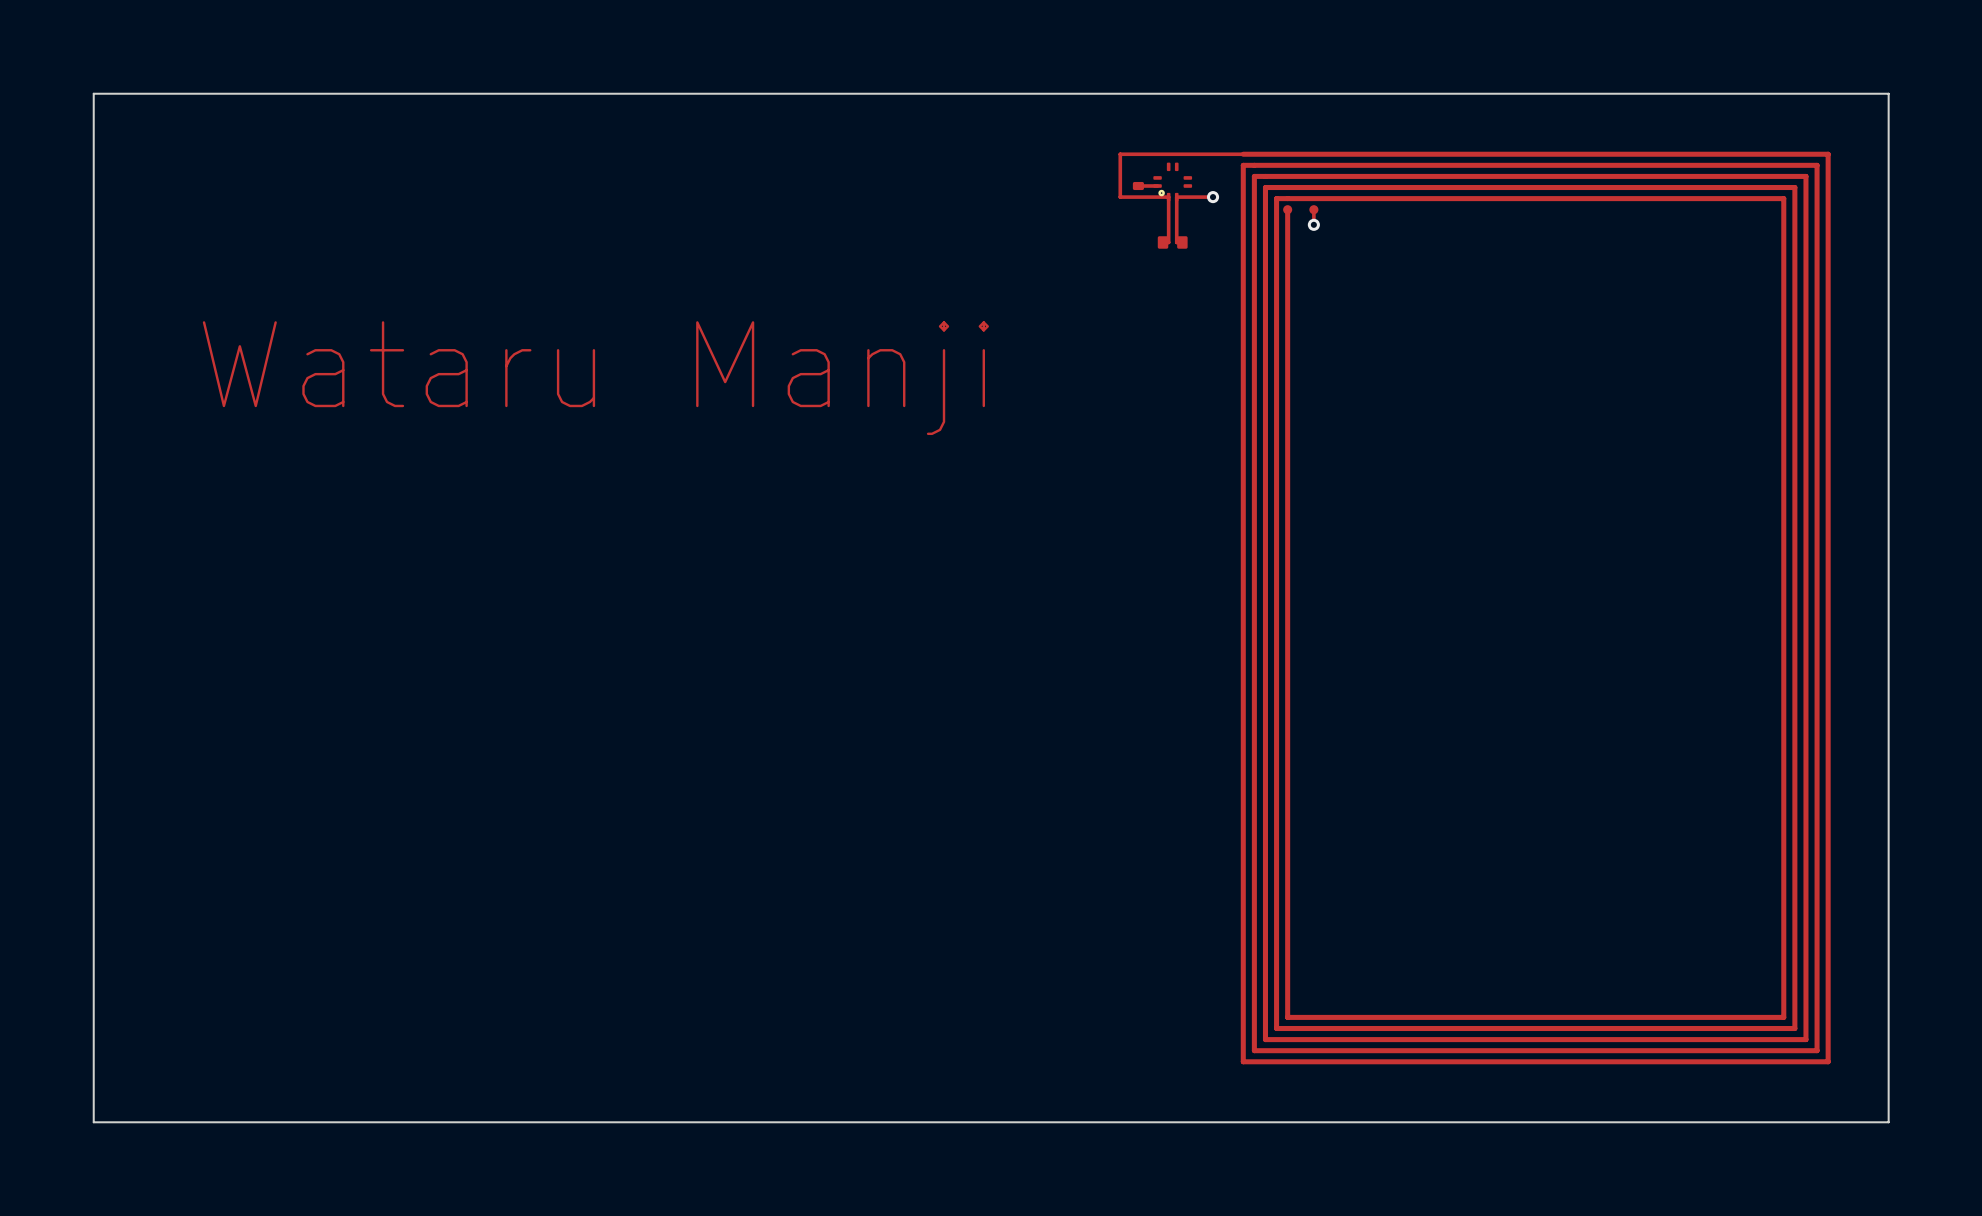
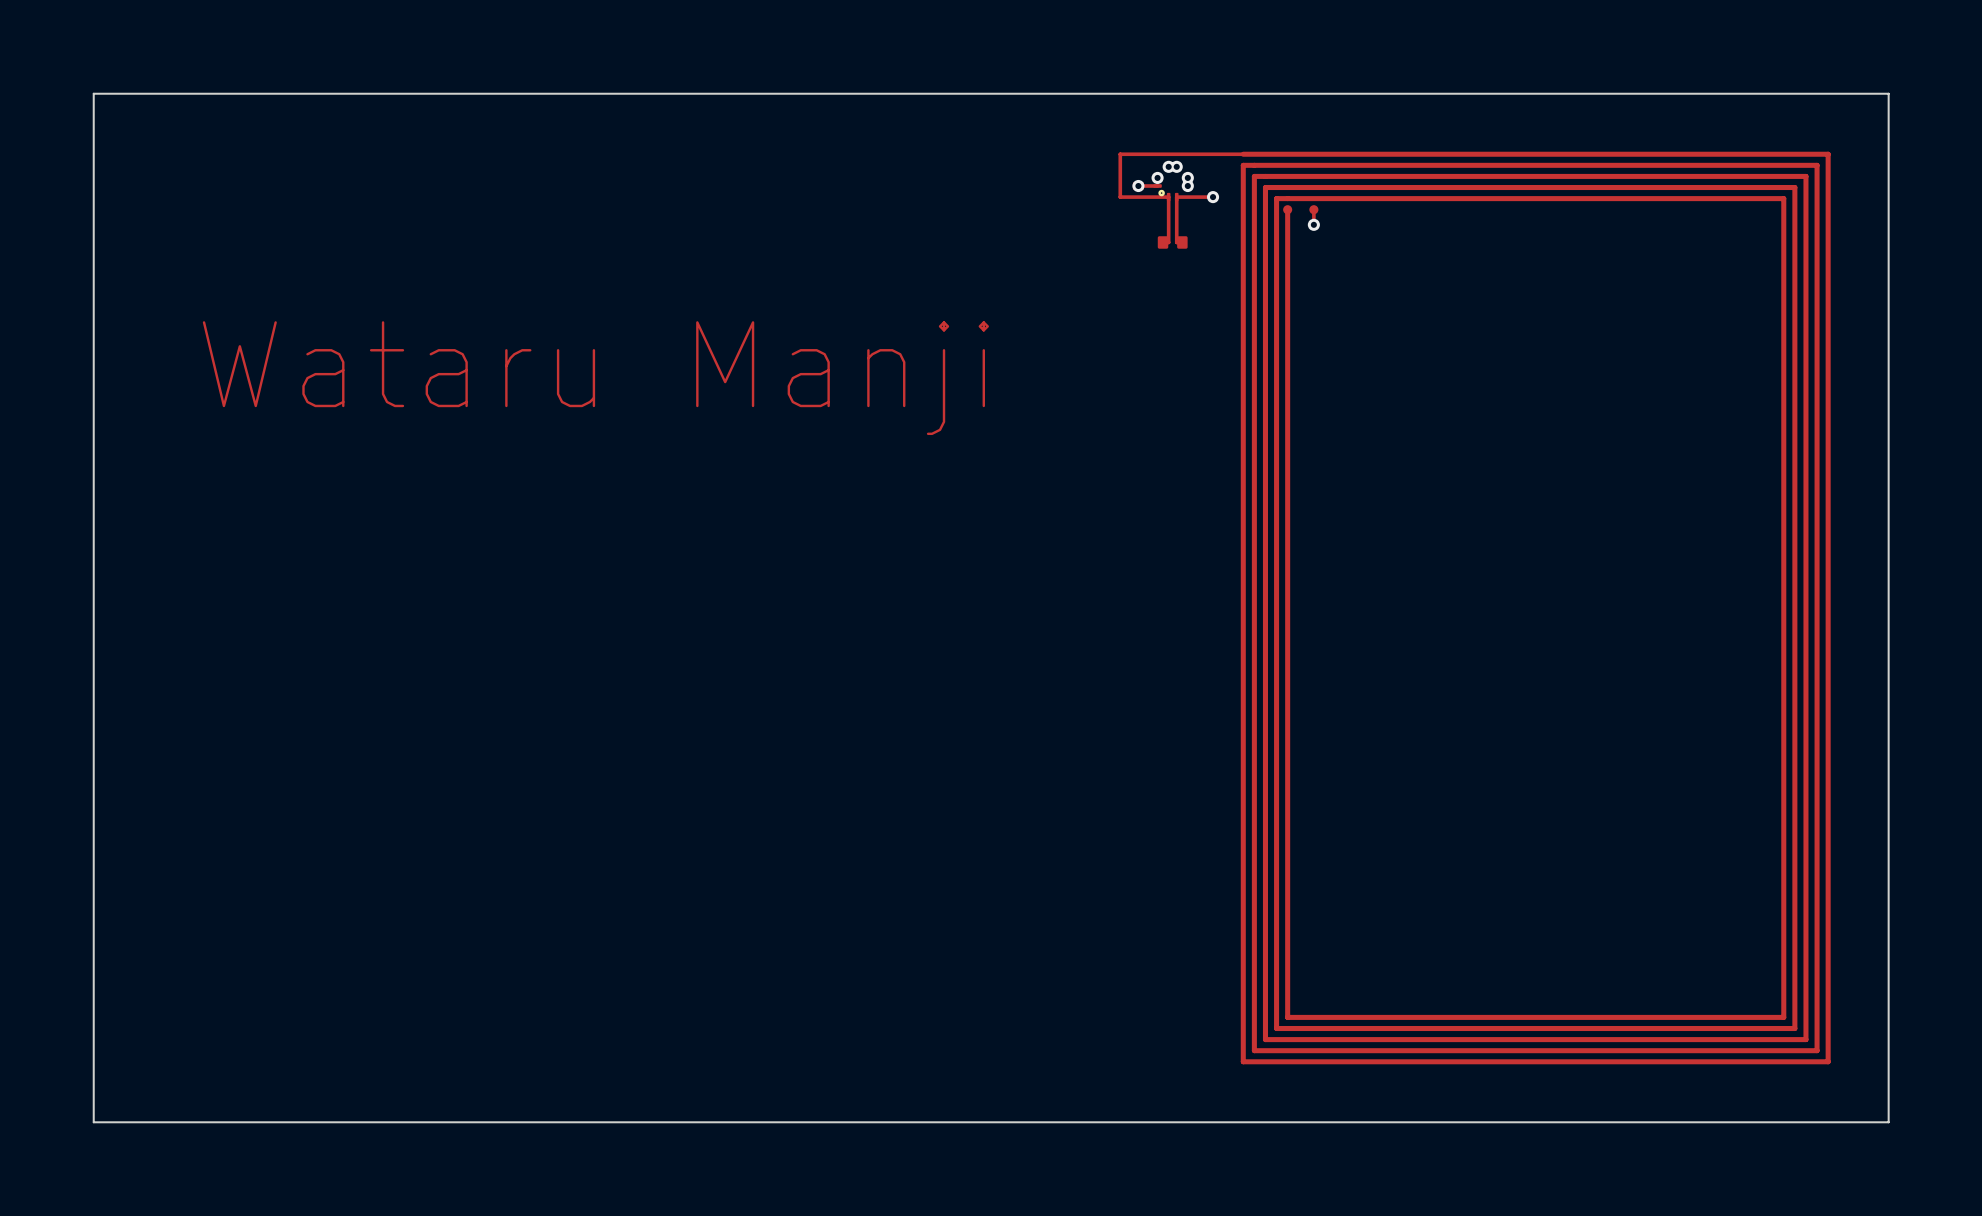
via: none -> (1168, 166)
via: none -> (1176, 166)
via: none -> (1157, 177)
via: none -> (1187, 177)
via: none -> (1138, 186)
via: none -> (1187, 186)

